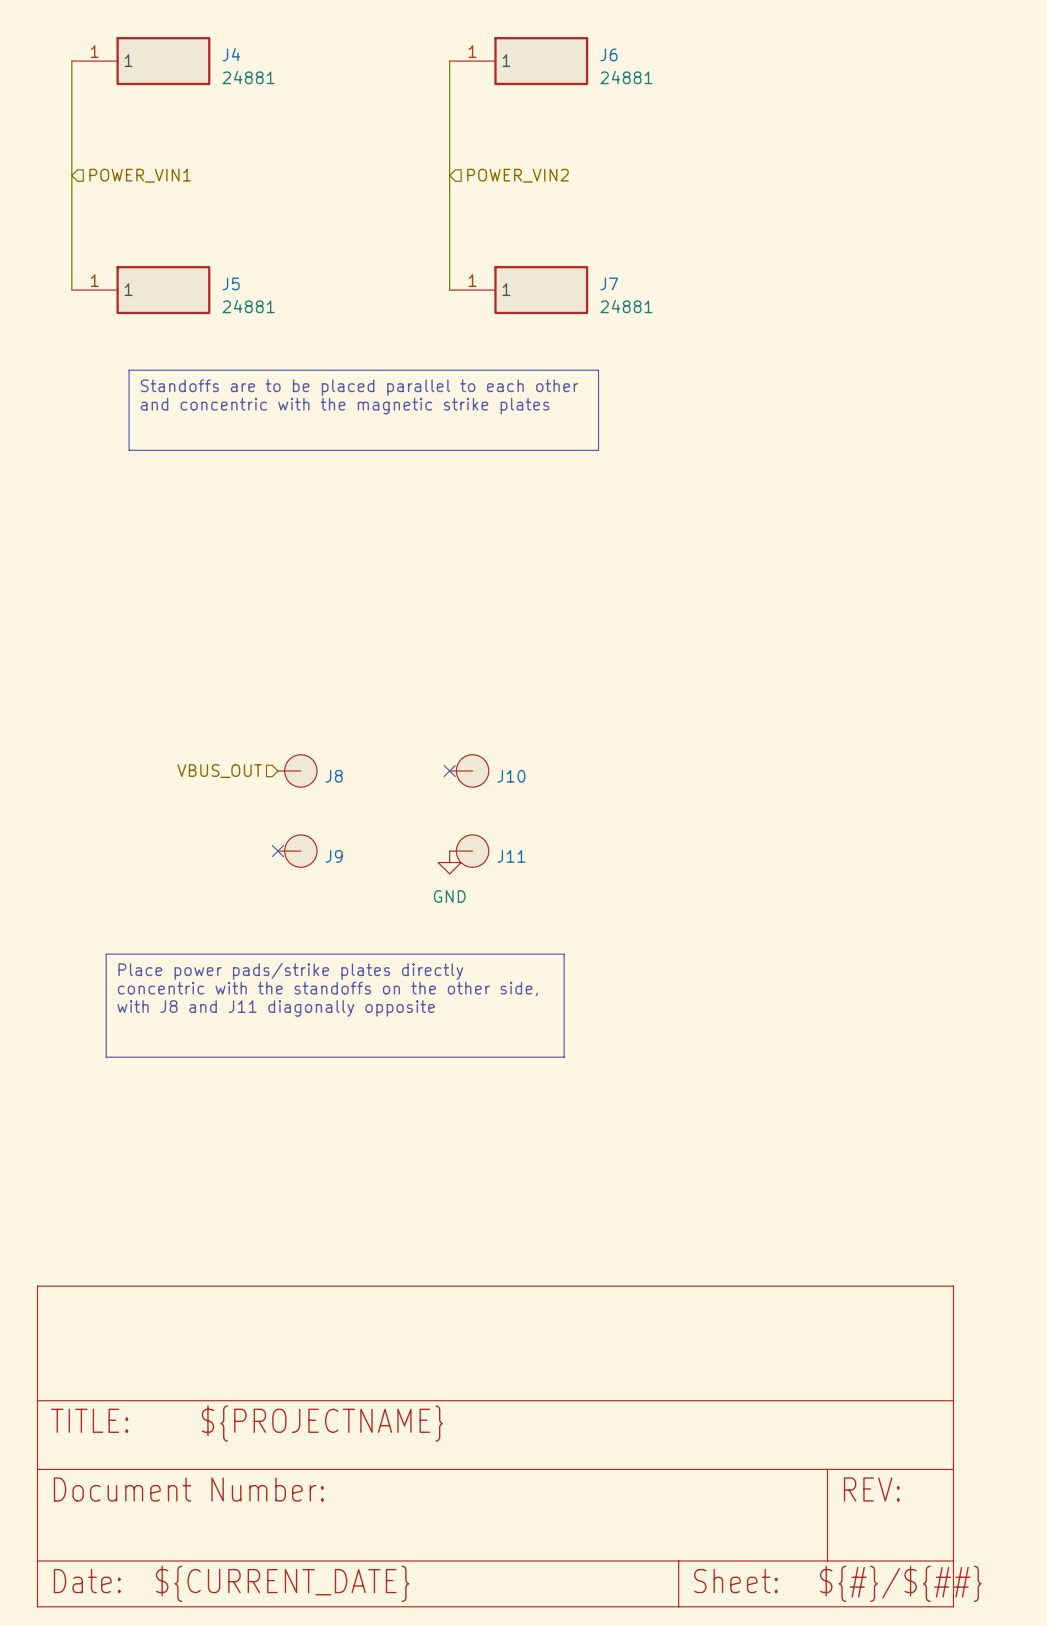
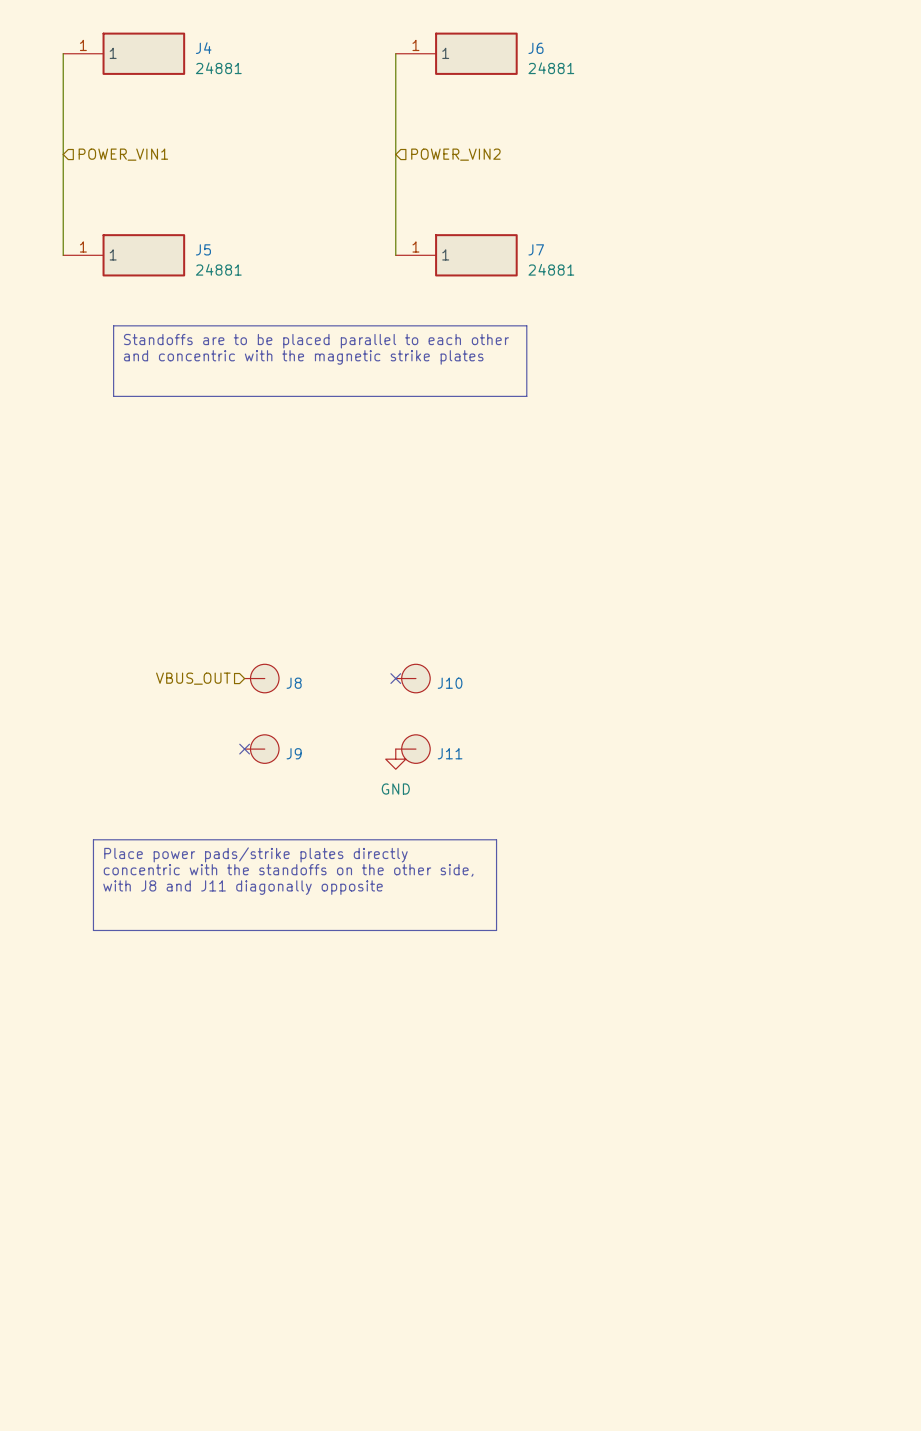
power symbol: (495, 1446) -> none

